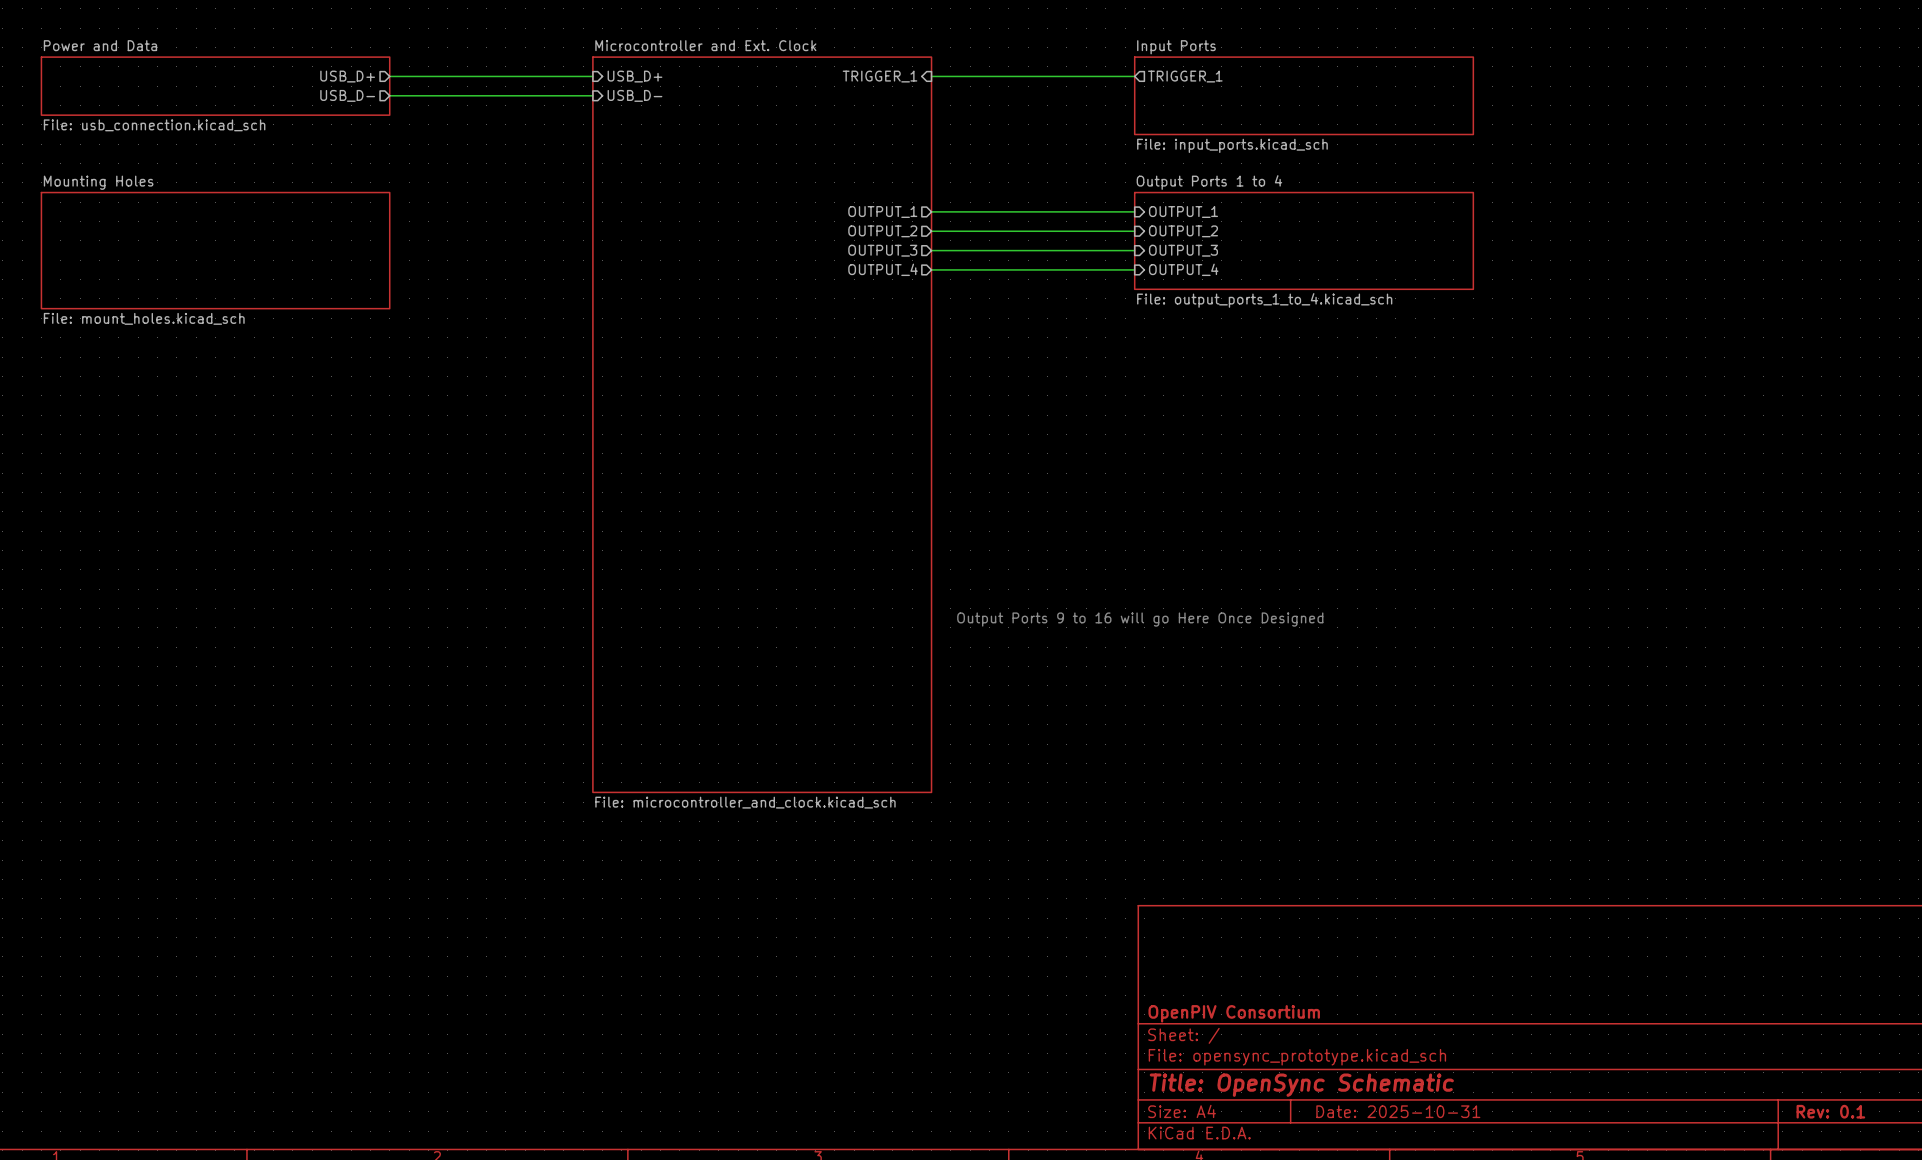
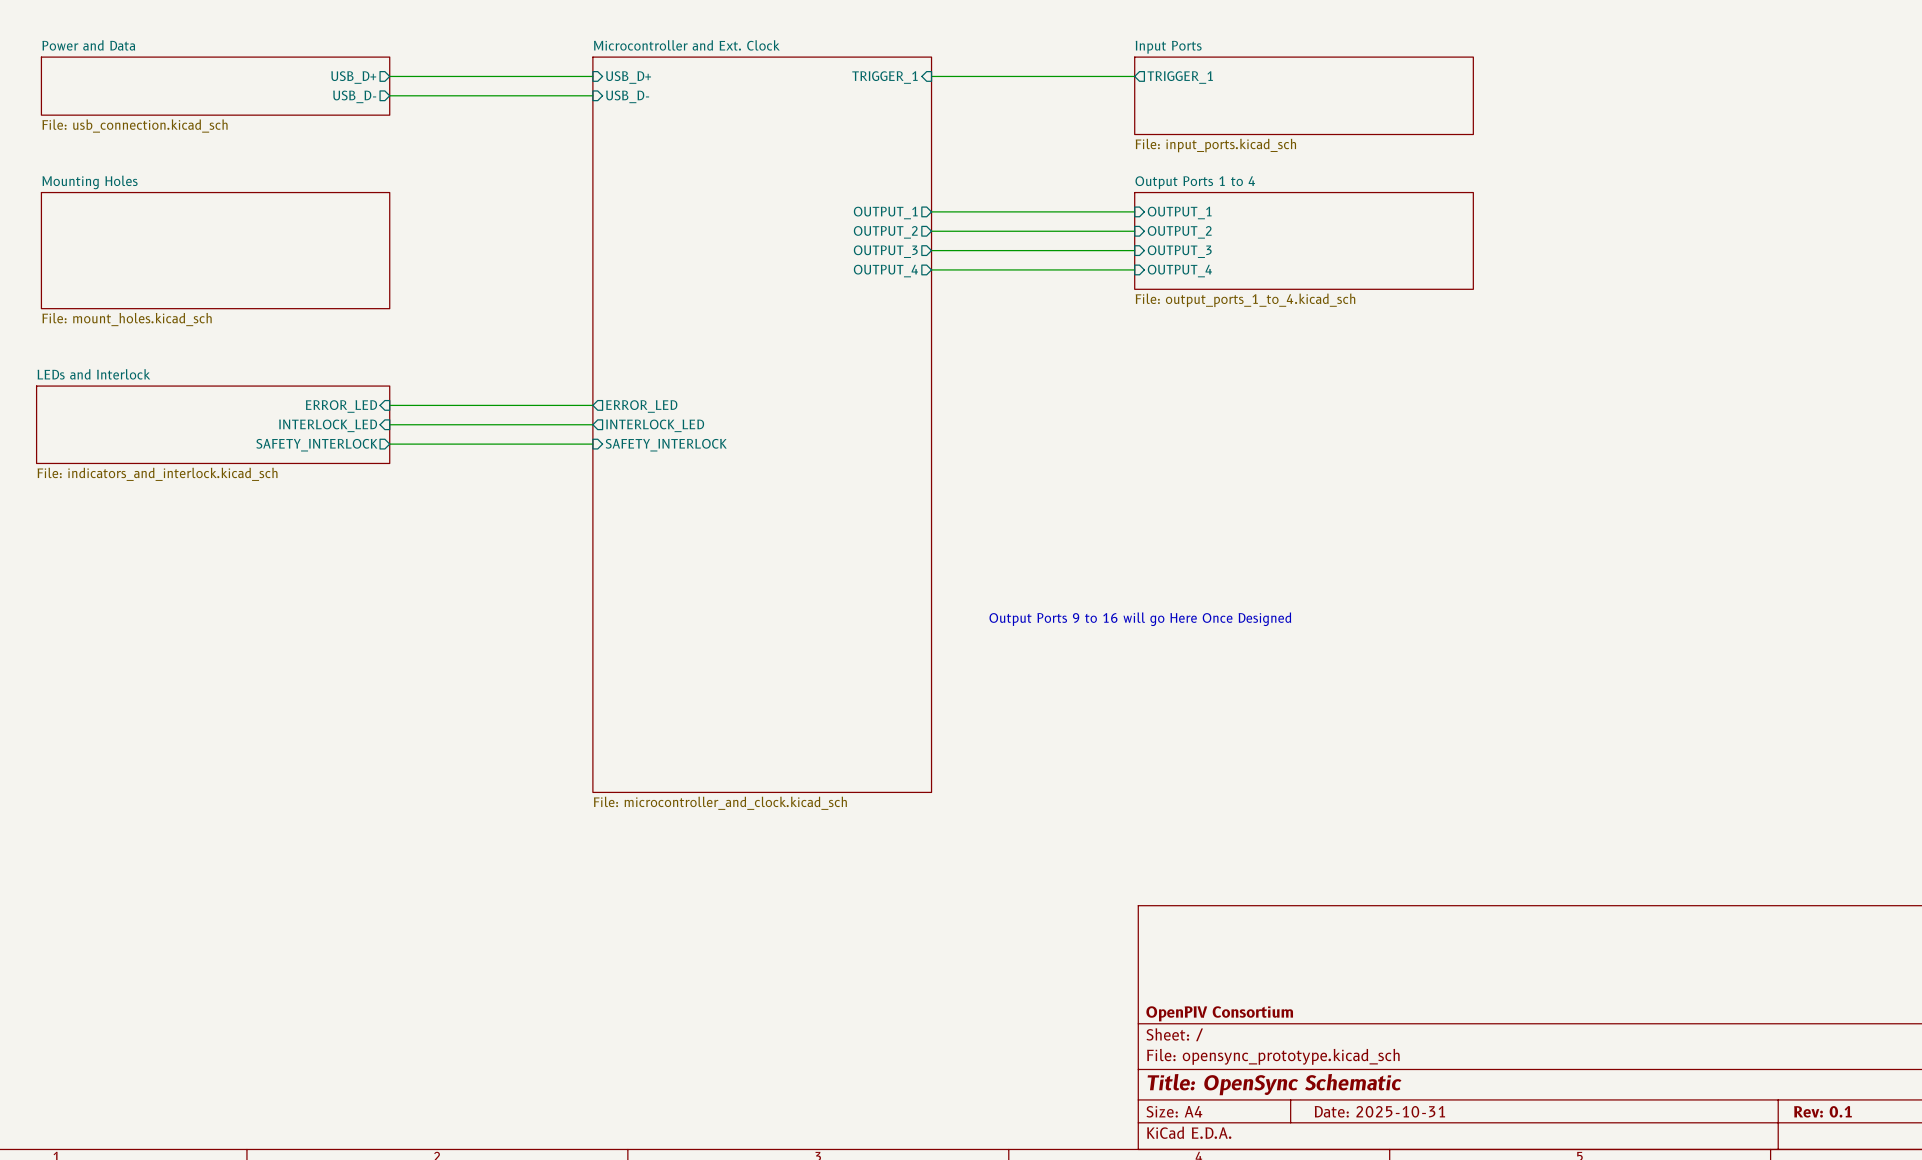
sheet pin: none -> ERROR_LED (341, 406)
wire: none -> (389, 405) (592, 405)
sheet pin: none -> ERROR_LED (641, 406)
sheet LEDs and Interlock: none -> File: indicators_and_interlock.kicad_sch (213, 424)
sheet pin: none -> INTERLOCK_LED (328, 425)
wire: none -> (389, 424) (592, 424)
sheet pin: none -> INTERLOCK_LED (655, 425)
sheet pin: none -> SAFETY_INTERLOCK (316, 445)
wire: none -> (389, 444) (592, 444)
sheet pin: none -> SAFETY_INTERLOCK (666, 445)

